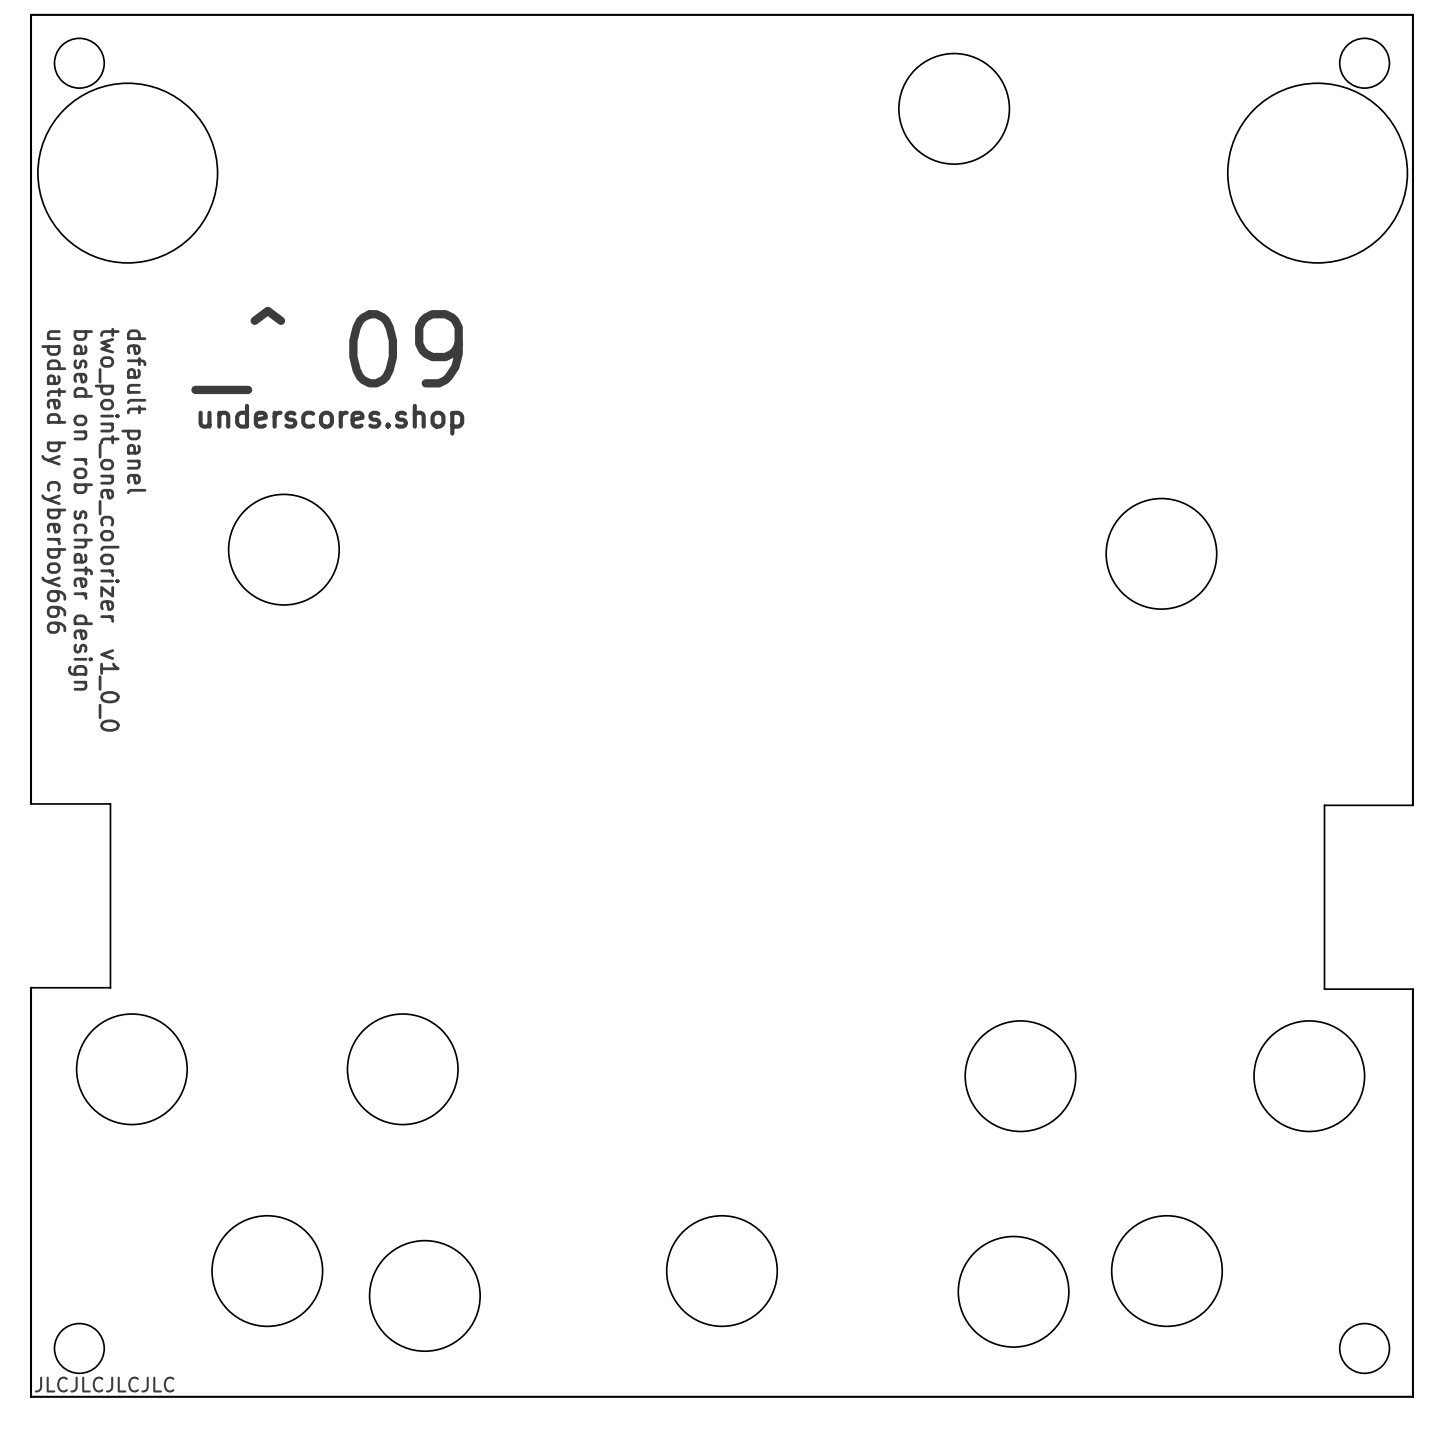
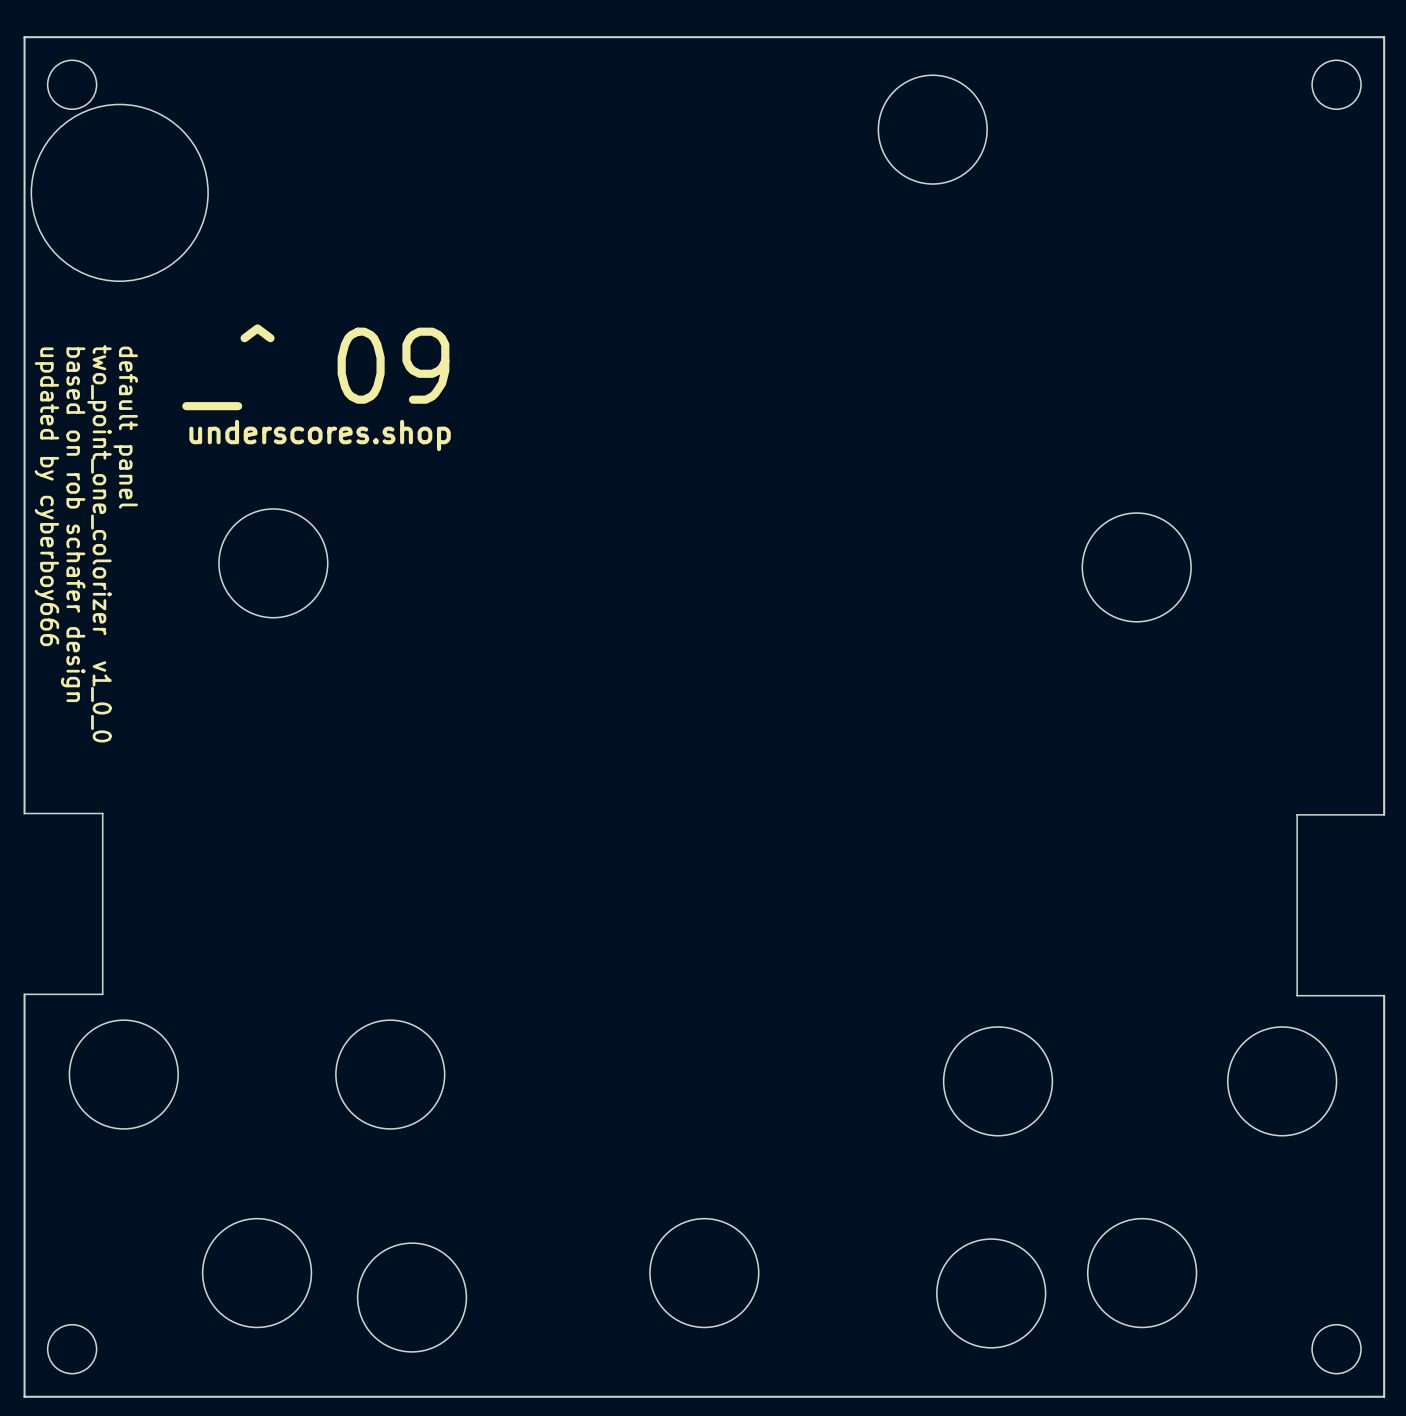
round board edge: [1227, 82, 1409, 264] -> none
text: JLCJLCJLCJLC (104, 1384) -> none

